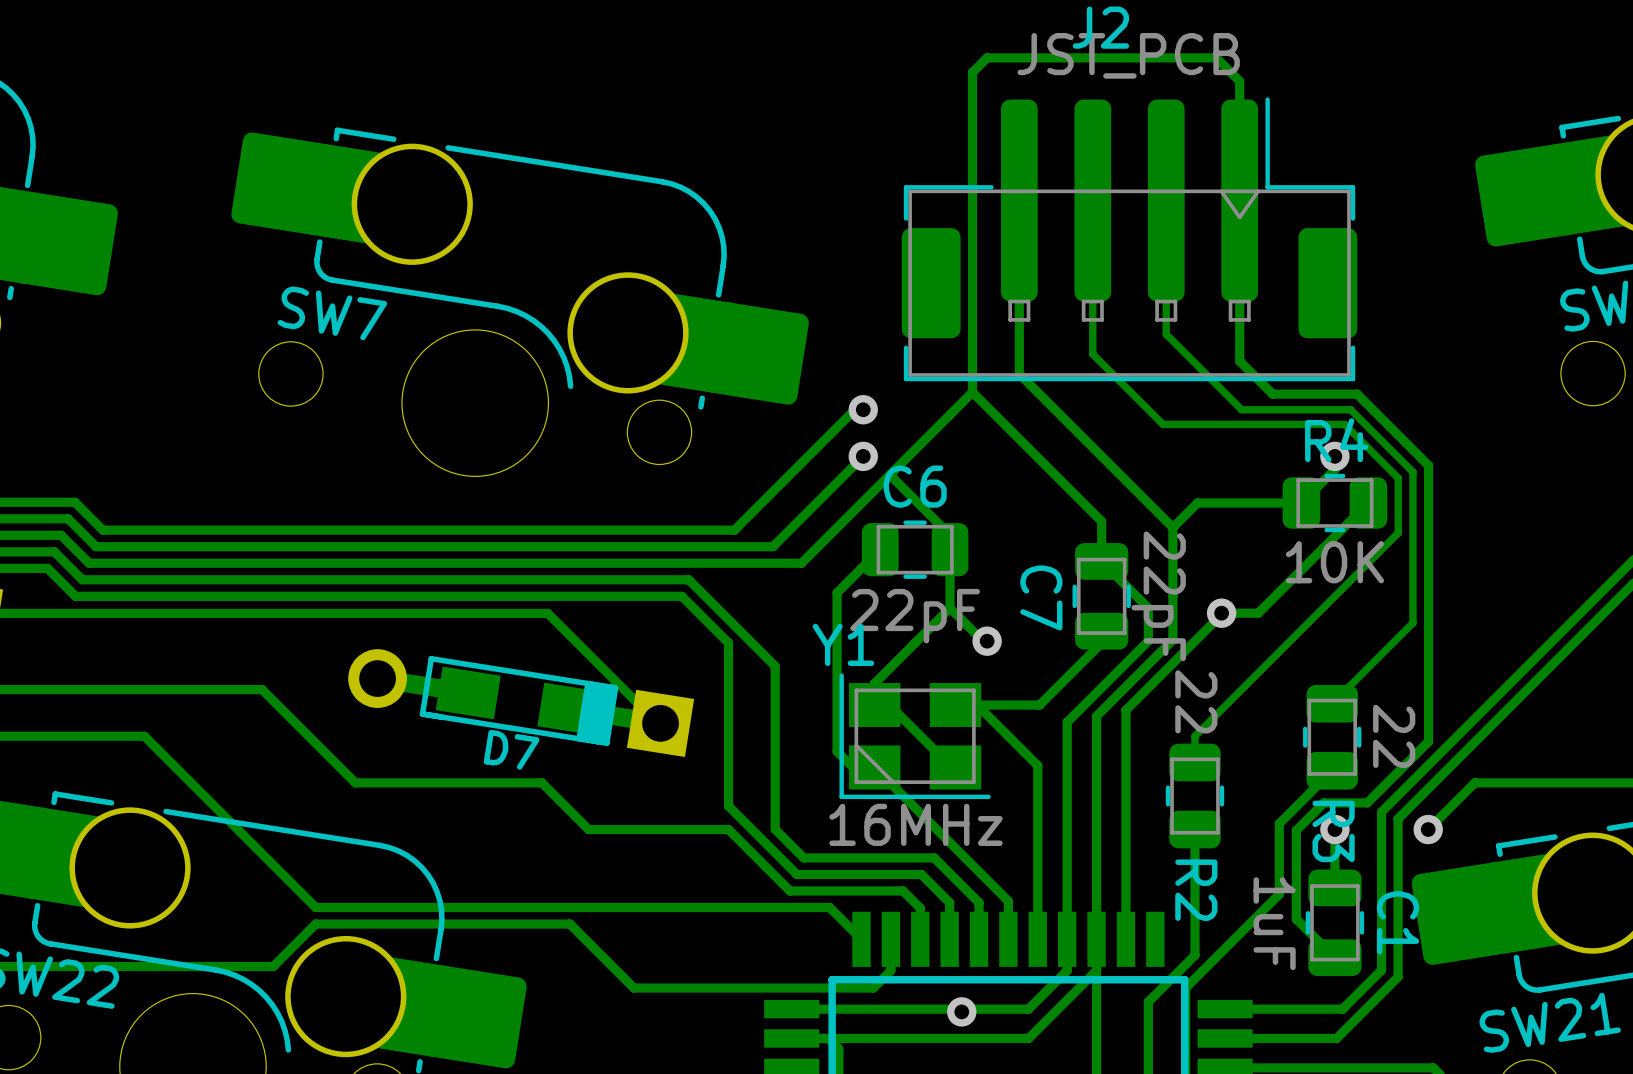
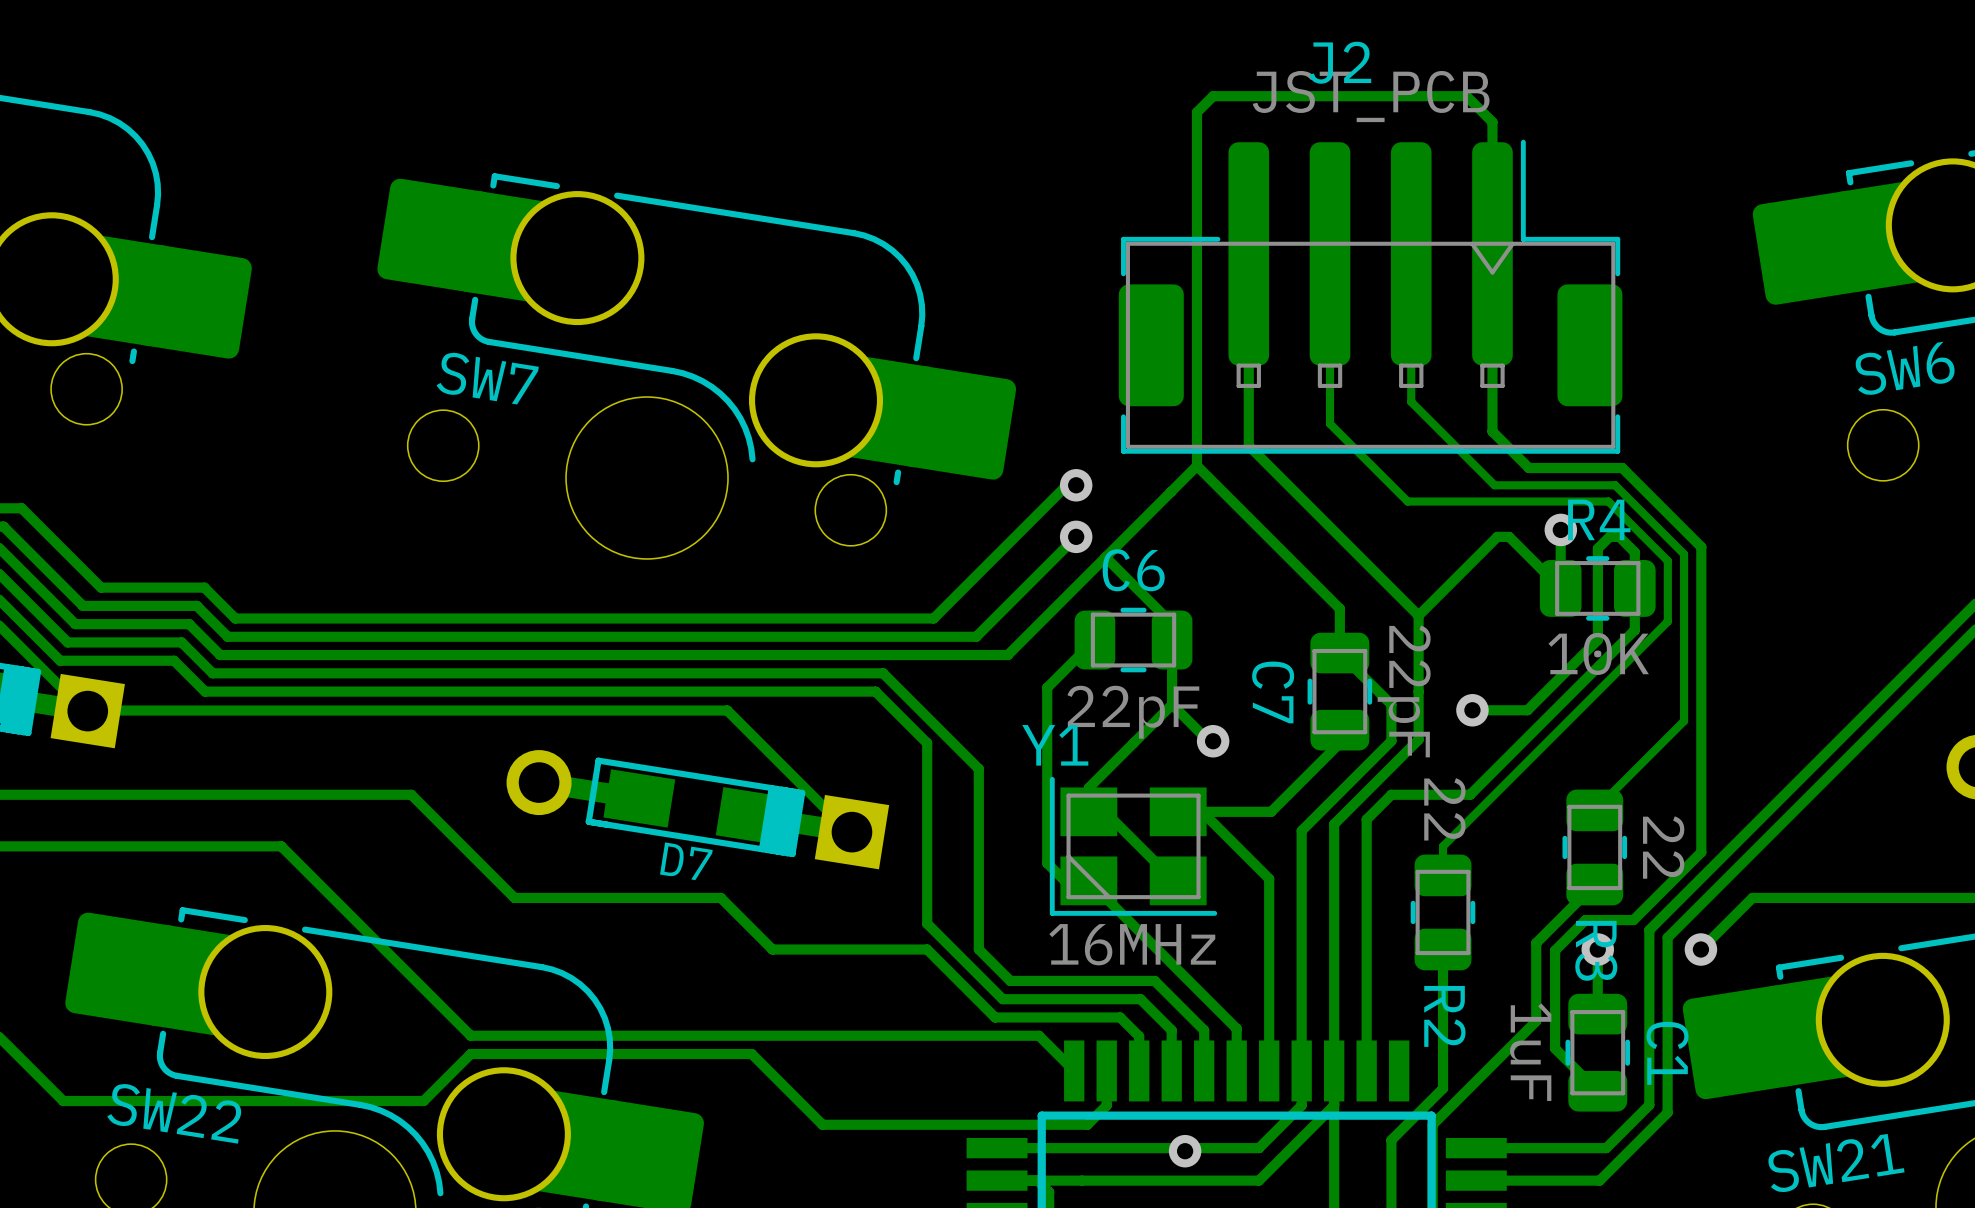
via position: (1334, 456) -> (1560, 529)
track: (1334, 469) (1301, 503) (1197, 503) -> (1560, 530) (1560, 588) (1509, 536) (1497, 536) (1445, 588)
track: (1368, 503) (1258, 613) -> (1597, 551) (1597, 639) (1527, 710) (1512, 710)
track: (1221, 614) (1125, 712) -> (1597, 548) (1609, 536) (1619, 536) (1634, 552) (1634, 630) (1470, 794) (1391, 794) (1366, 819)

